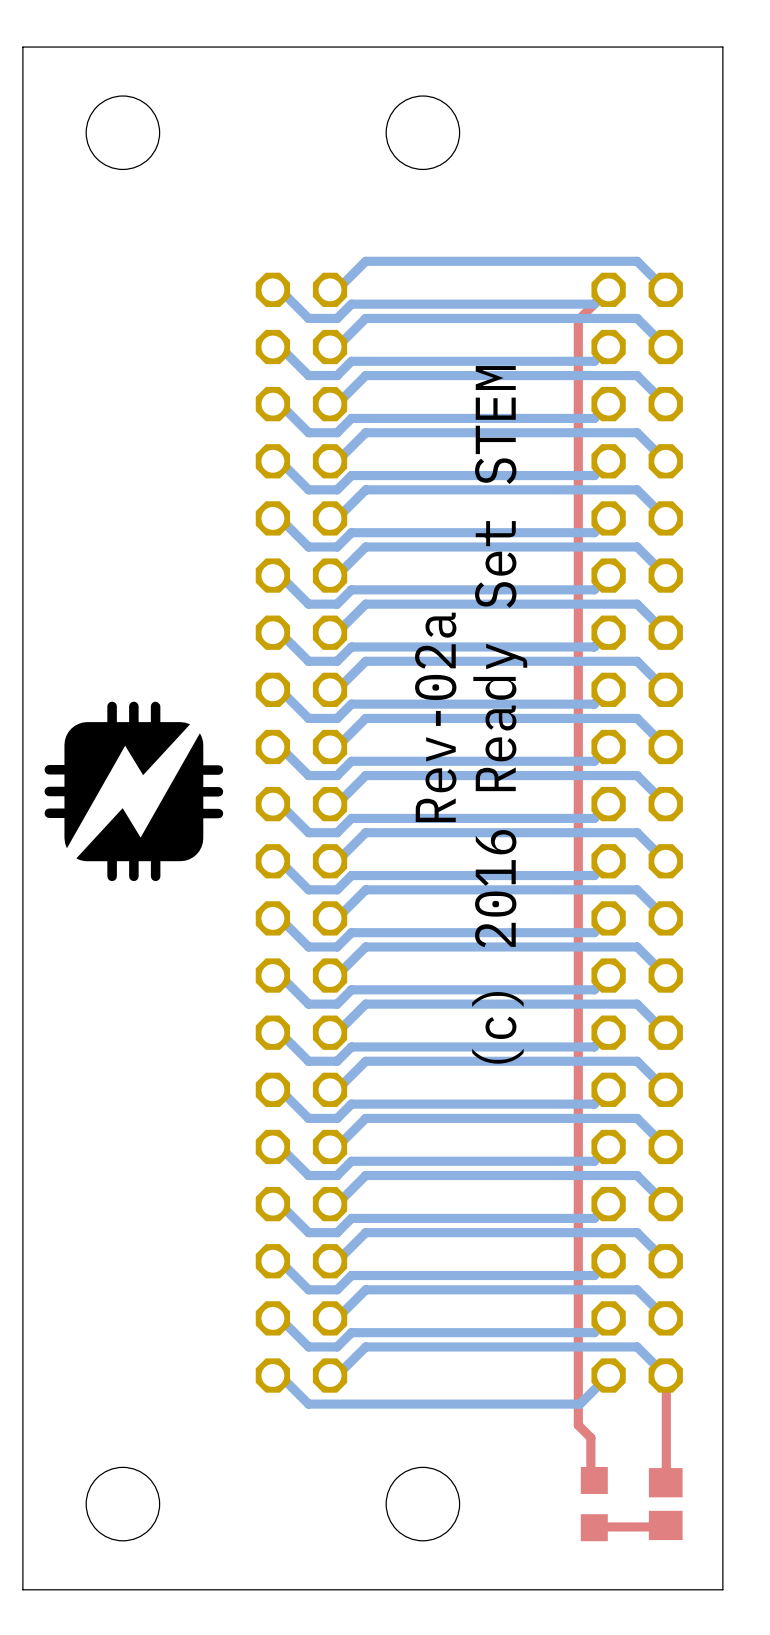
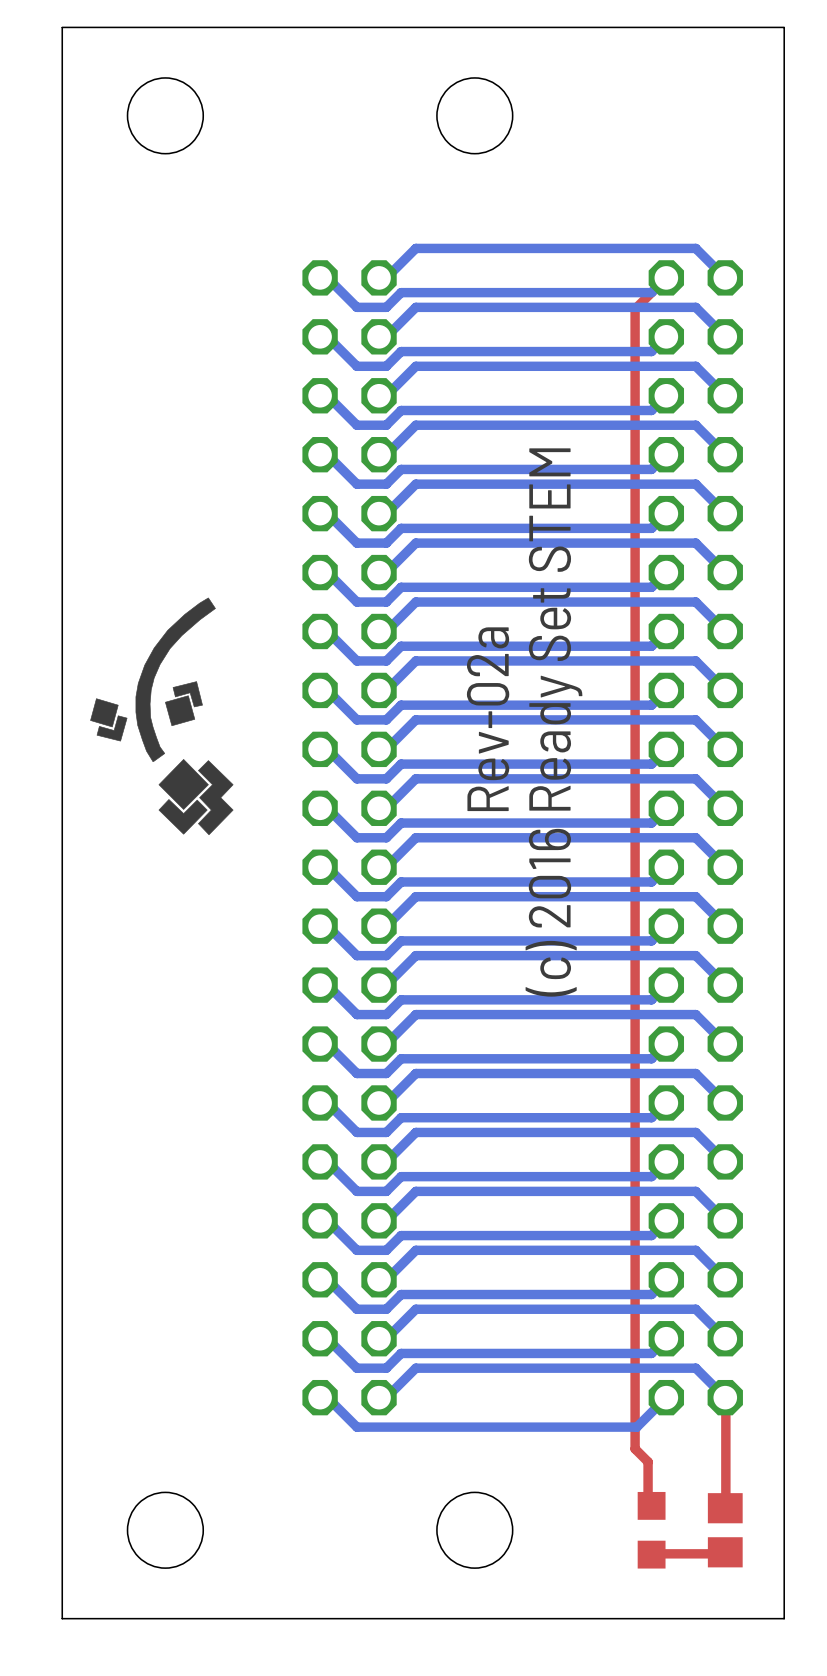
drawing: none -> [90, 597, 234, 836]
drawing: [44, 701, 191, 849] -> none
drawing shape: [76, 733, 224, 882] -> [158, 799, 208, 835]

